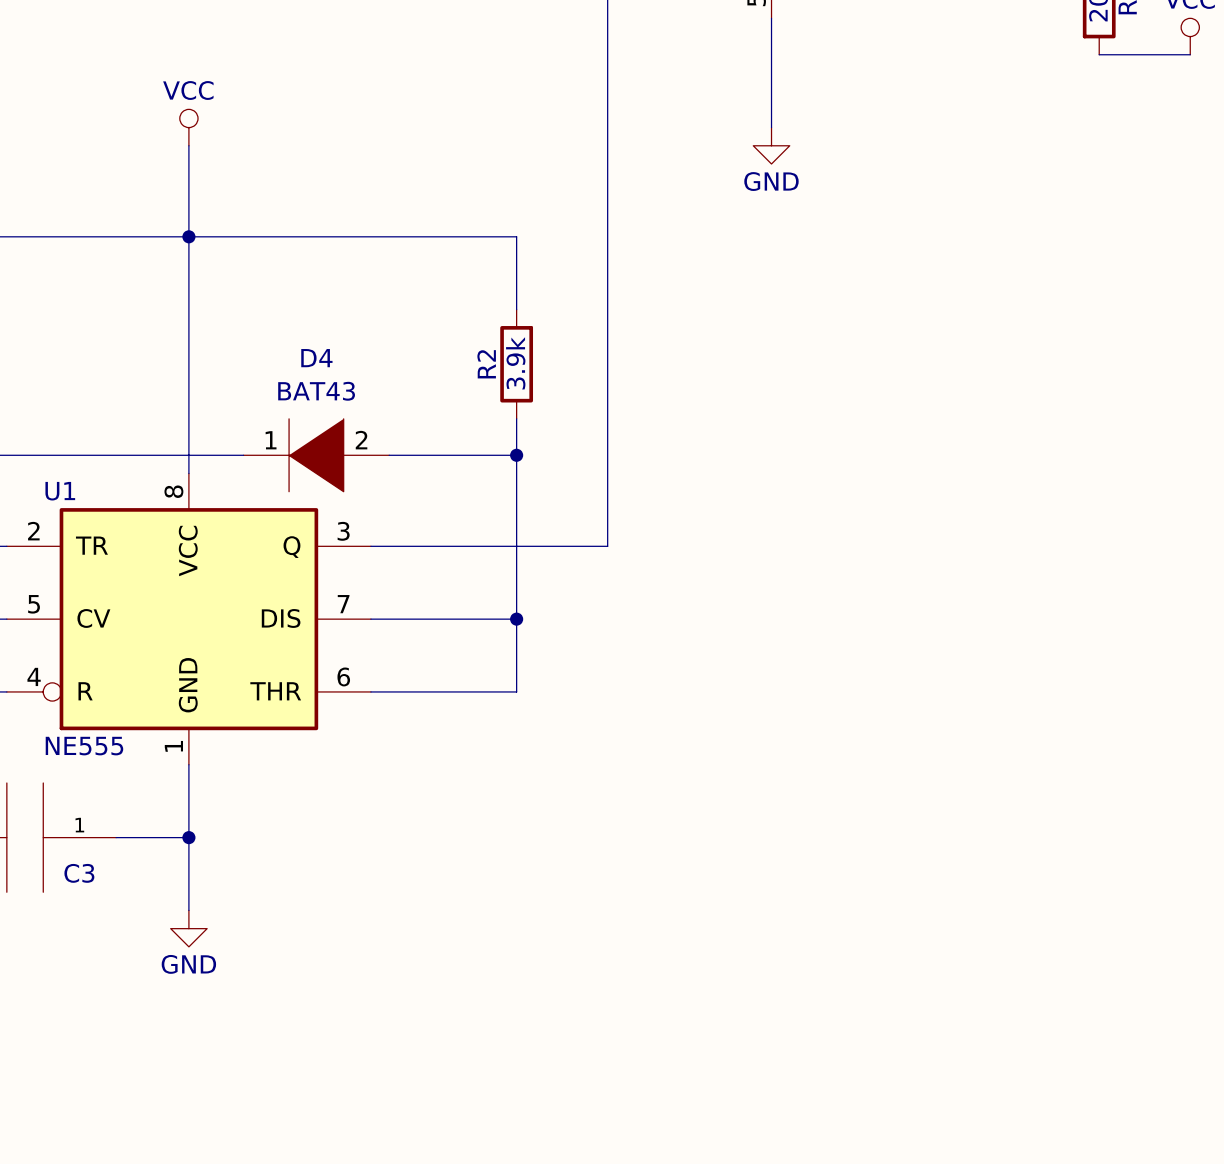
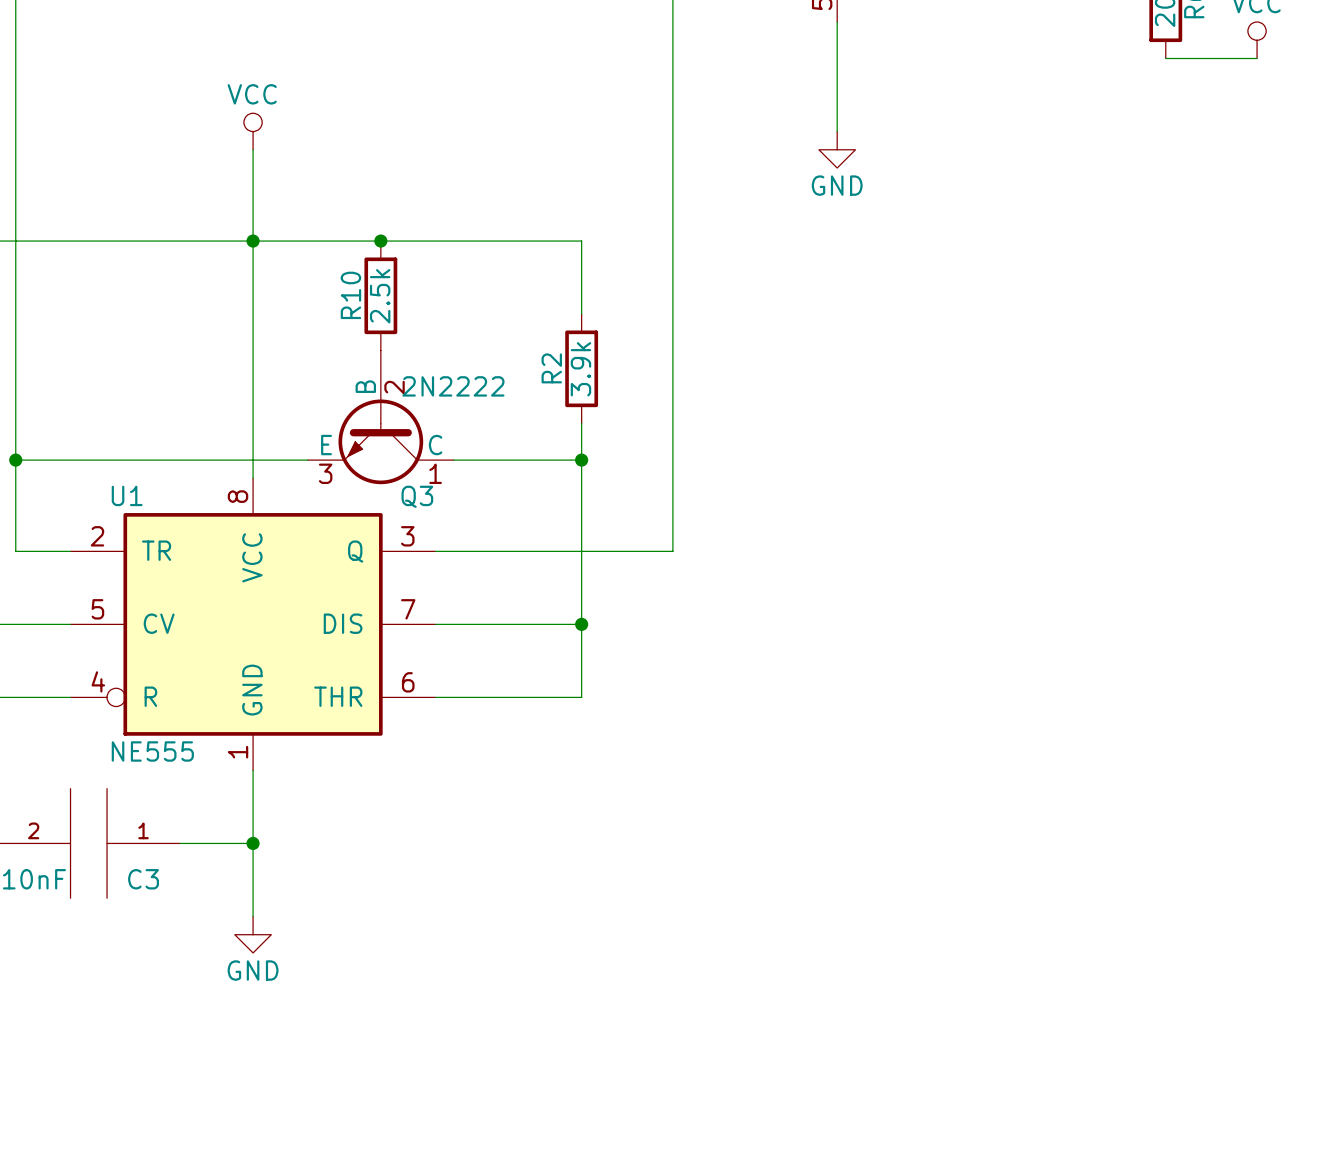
junction: none -> (380, 241)
R10: none -> 2.5k (380, 295)
Q3: none -> 2N2222 (380, 417)
D4: BAT43 (316, 455) -> none

